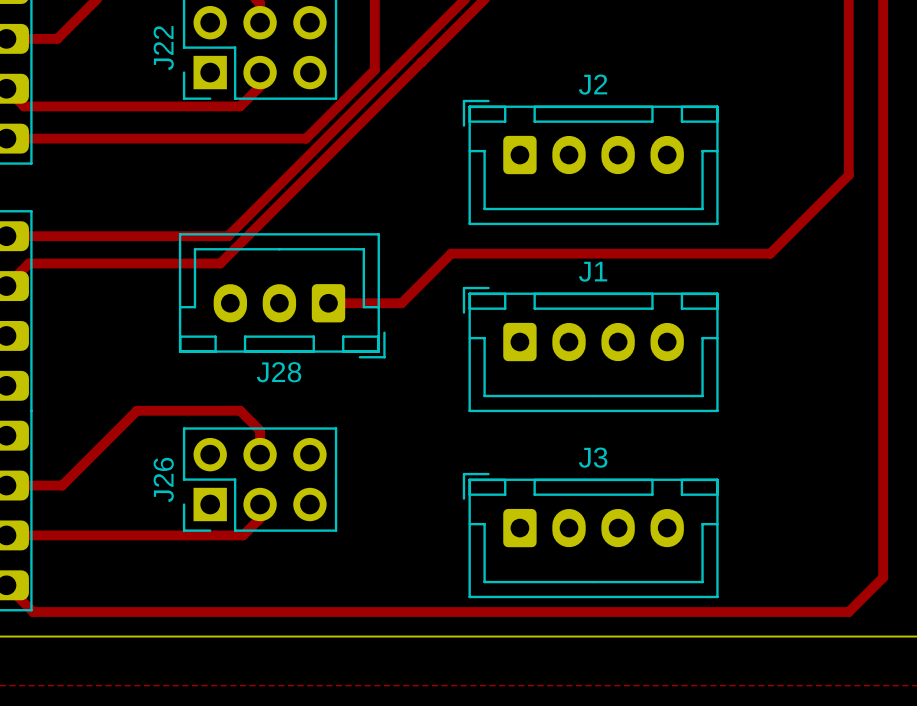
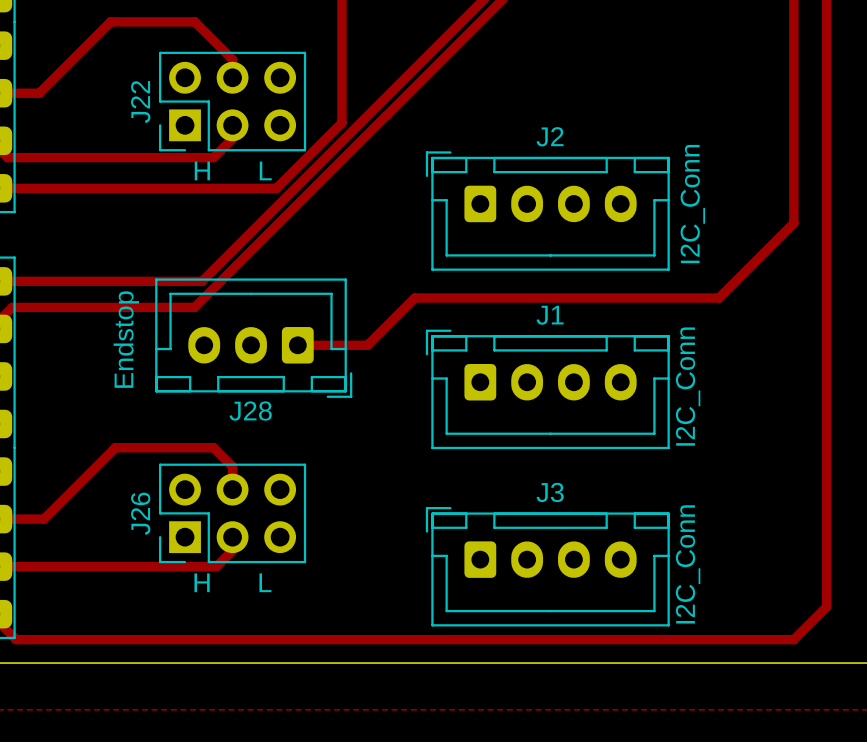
text: none -> H L (233, 170)
J2 value: none -> I2C_Conn (692, 204)
text: none -> Endstop (126, 339)
J1 value: none -> I2C_Conn (688, 386)
J3 value: none -> I2C_Conn (688, 564)
text: none -> H L (232, 582)

